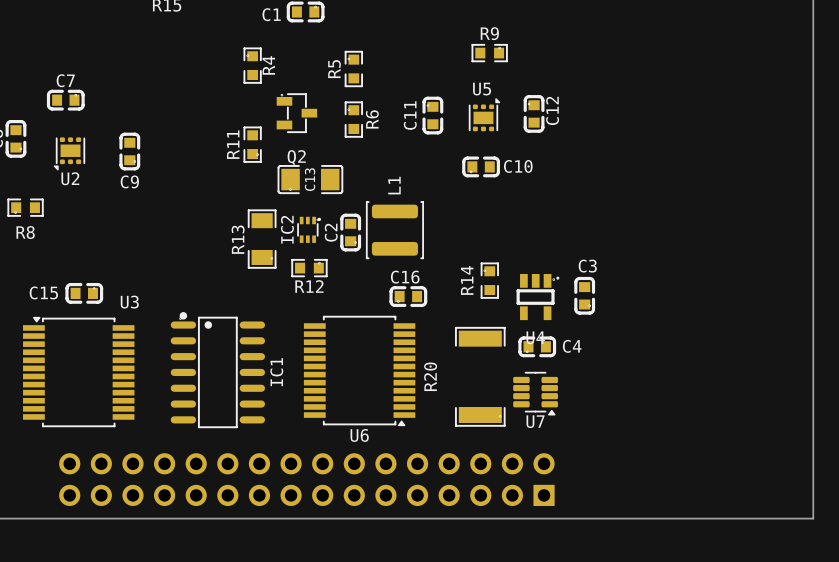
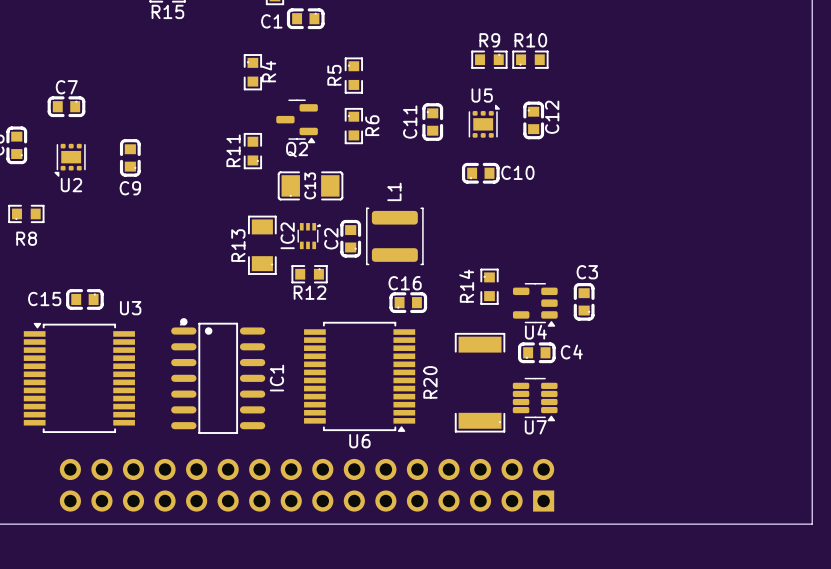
R10: none -> (530, 59)
Q2 footprint: [276, 93, 318, 134] -> [276, 99, 318, 144]
U4 footprint: [516, 273, 560, 321] -> [512, 283, 558, 327]

